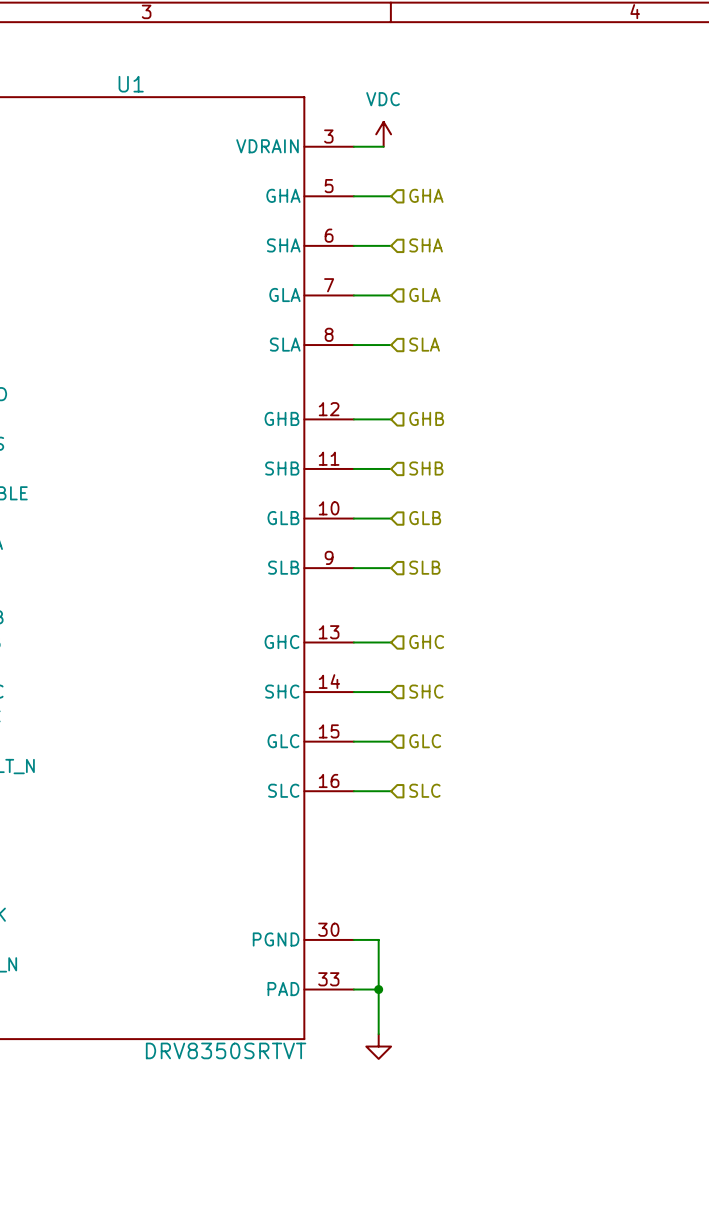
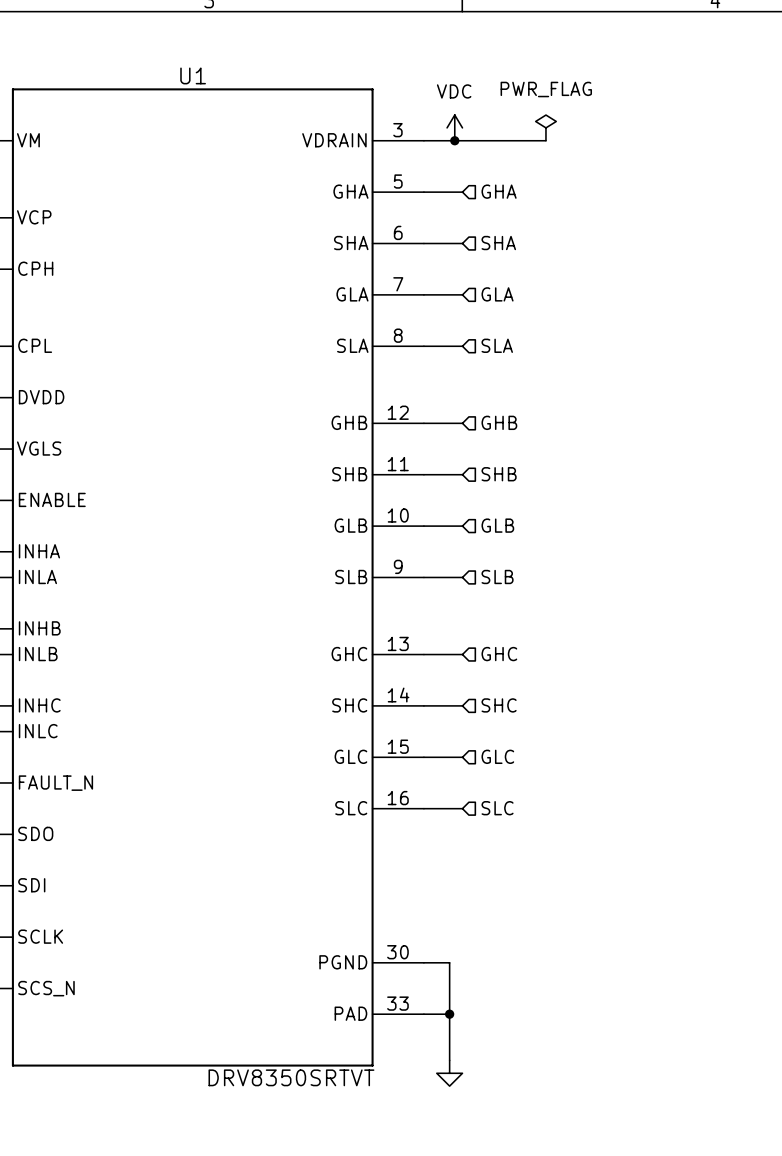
power symbol: none -> PWR_FLAG (545, 127)
wire: none -> (454, 140) (545, 140)
junction: none -> (454, 140)

